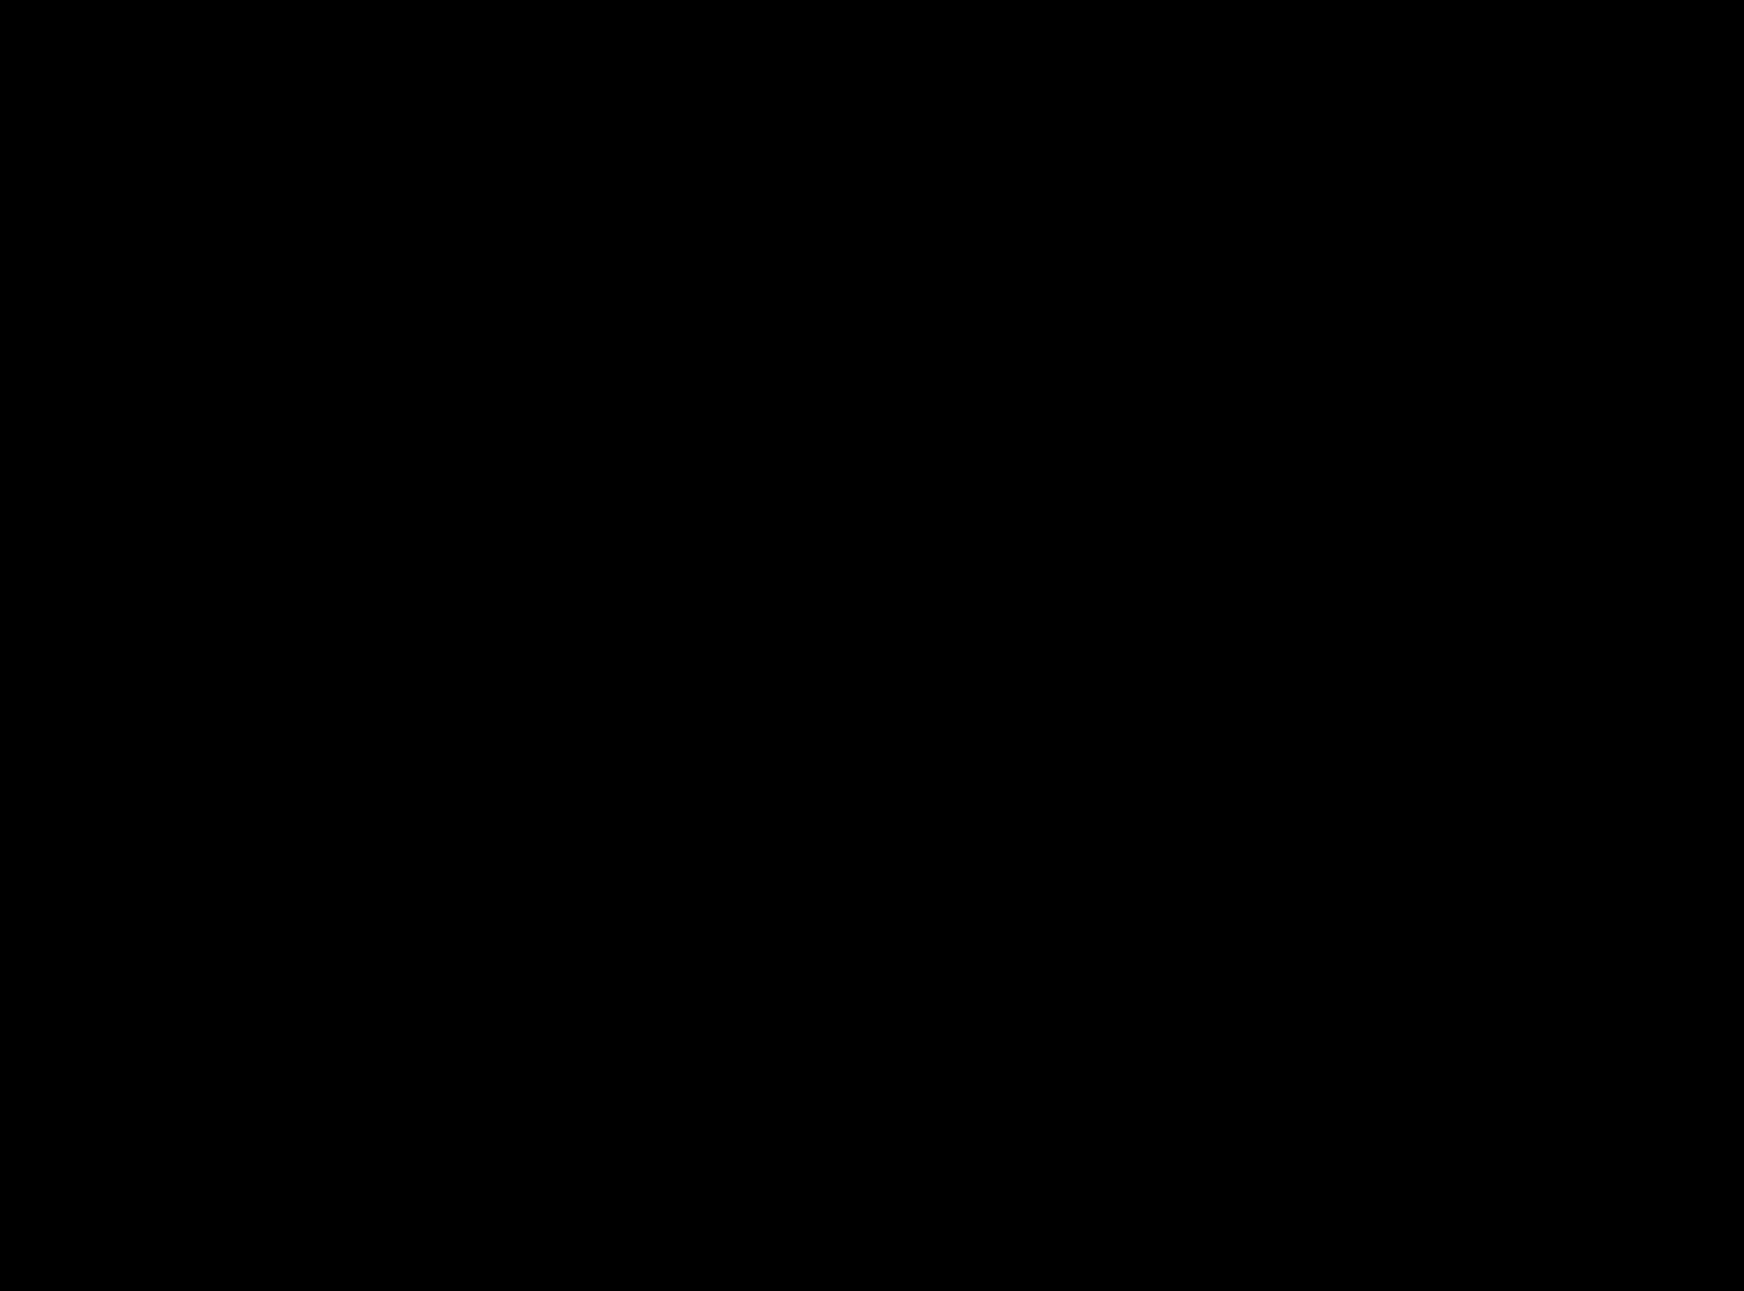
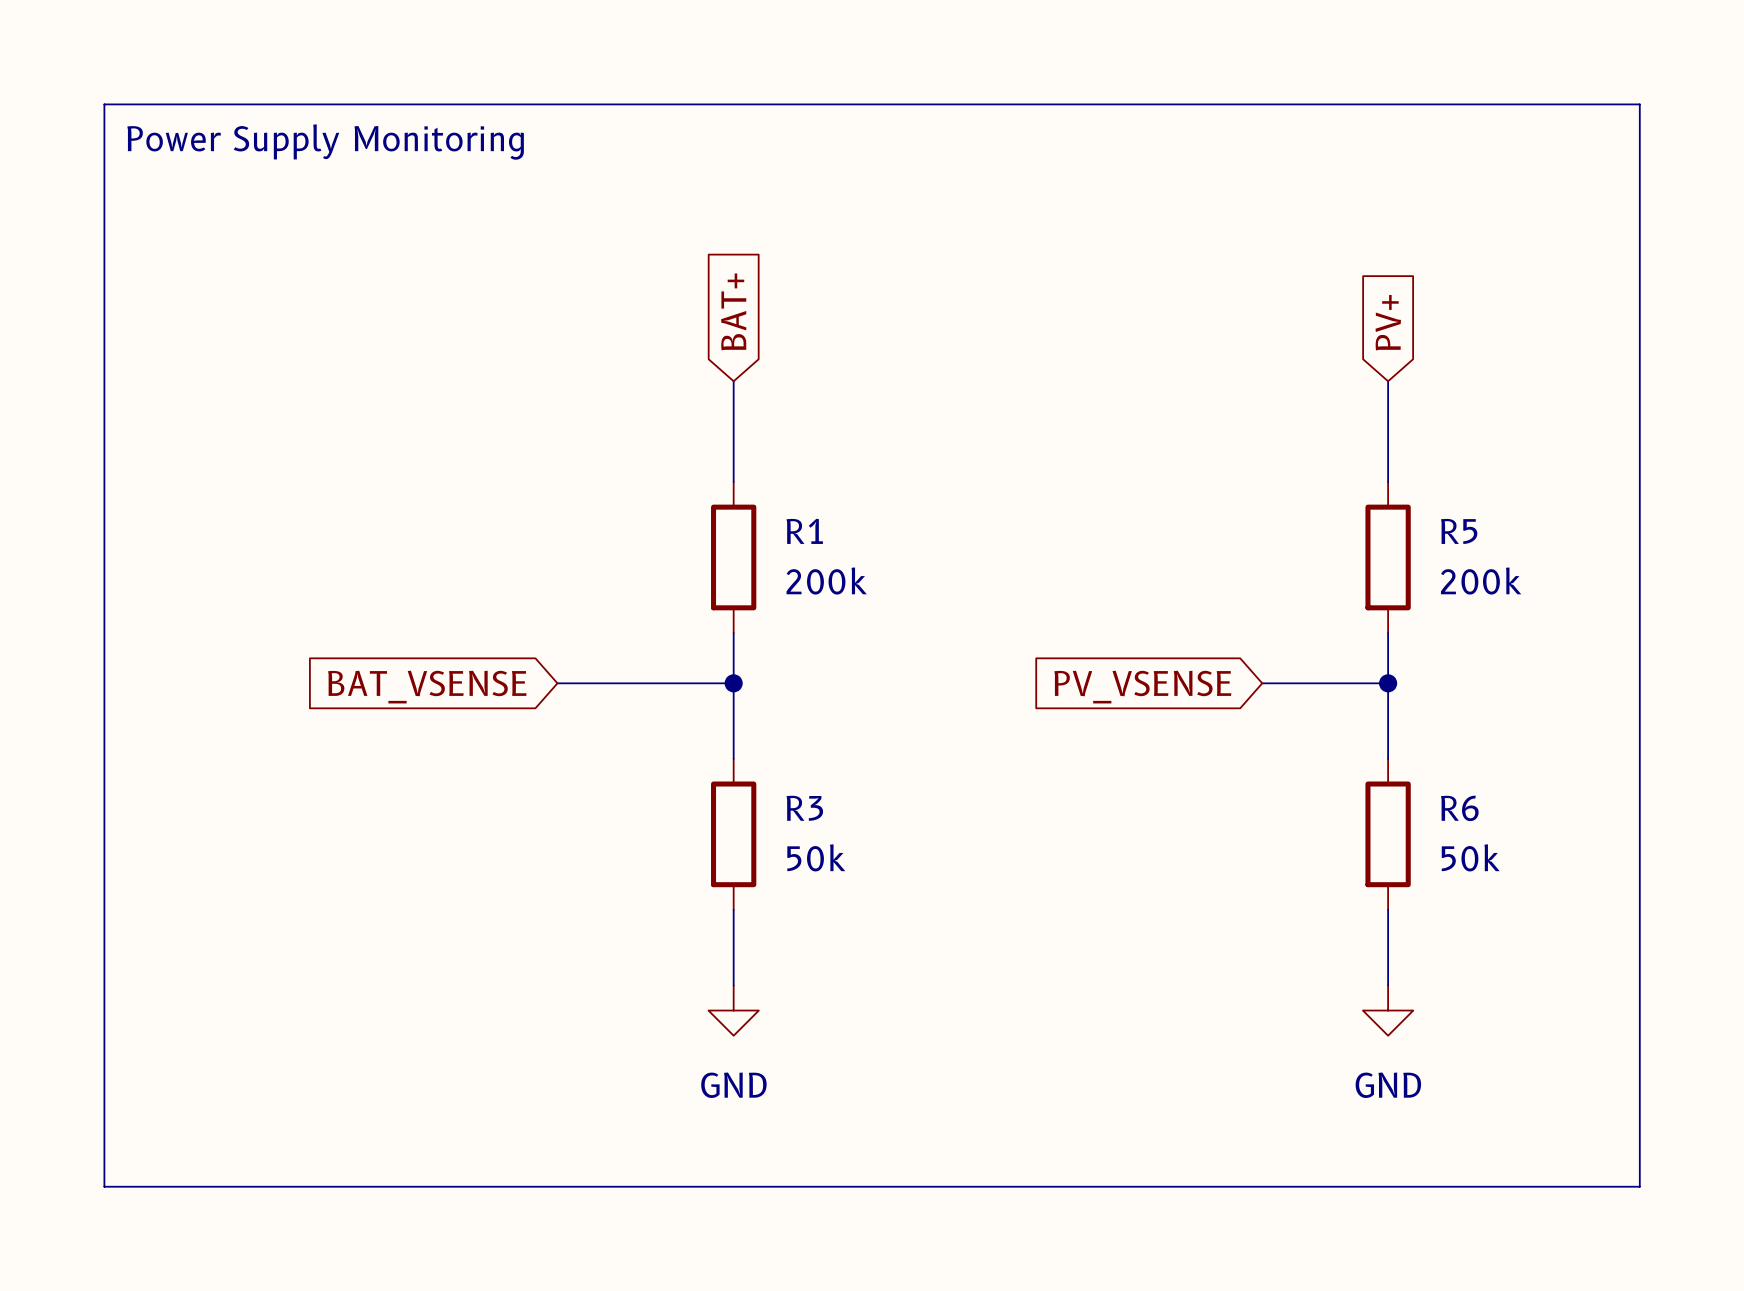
line: none -> (104, 104) (1639, 104) (1639, 1186) (104, 1186) (104, 104)
text: none -> Power Supply Monitoring (325, 142)
global label: none -> BAT+ (733, 311)
global label: none -> PV+ (1388, 322)
wire: none -> (733, 381) (733, 481)
wire: none -> (1388, 381) (1388, 481)
R1: none -> 200k (733, 557)
R5: none -> 200k (1388, 557)
wire: none -> (733, 632) (733, 758)
wire: none -> (1388, 632) (1388, 758)
wire: none -> (557, 683) (733, 683)
junction: none -> (733, 683)
wire: none -> (1262, 683) (1388, 683)
junction: none -> (1388, 683)
global label: none -> BAT_VSENSE (427, 687)
global label: none -> PV_VSENSE (1142, 687)
R3: none -> 50k (733, 834)
R6: none -> 50k (1388, 834)
wire: none -> (733, 909) (733, 985)
wire: none -> (1388, 909) (1388, 985)
power symbol: none -> GND (733, 1010)
power symbol: none -> GND (1388, 1010)

